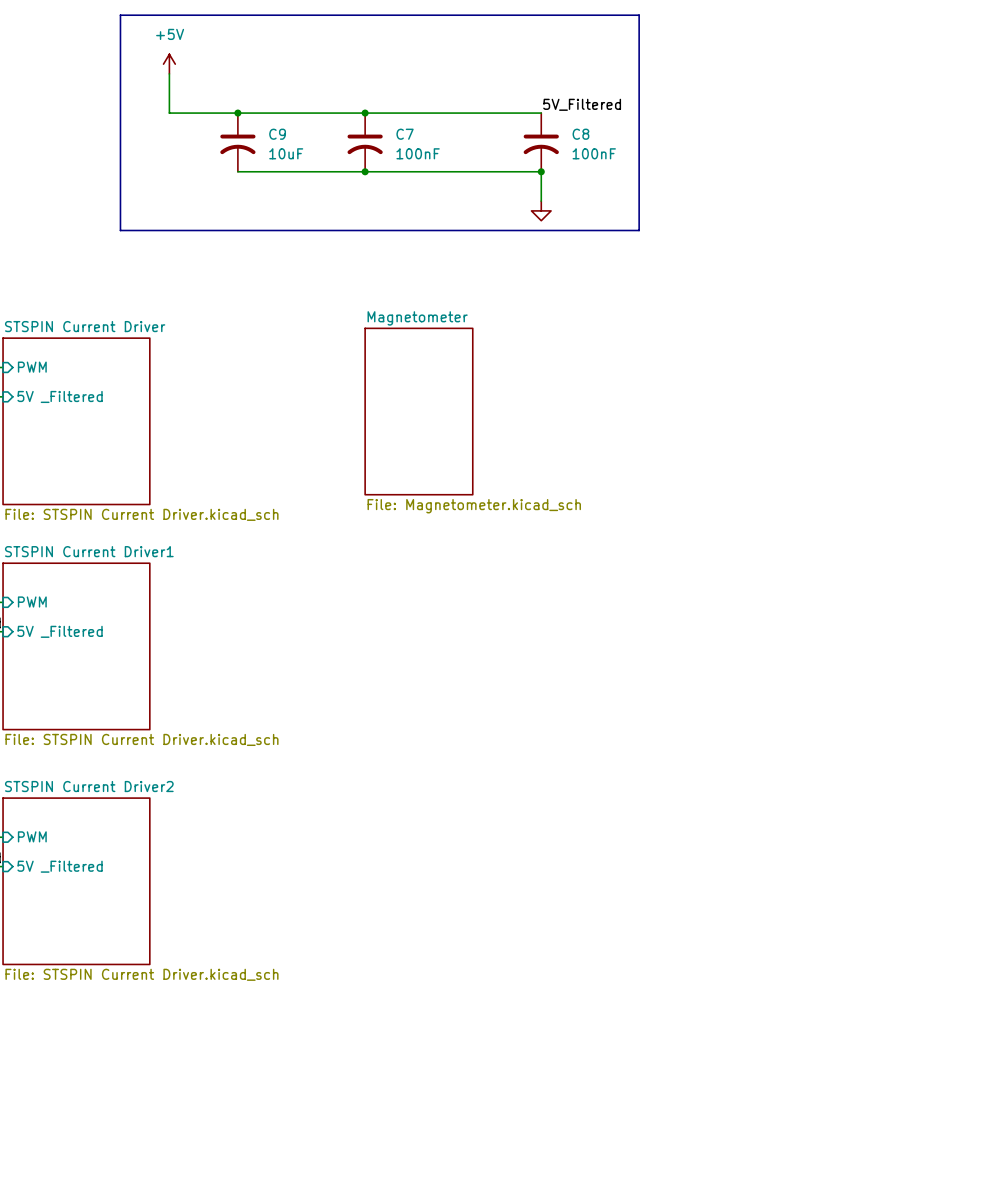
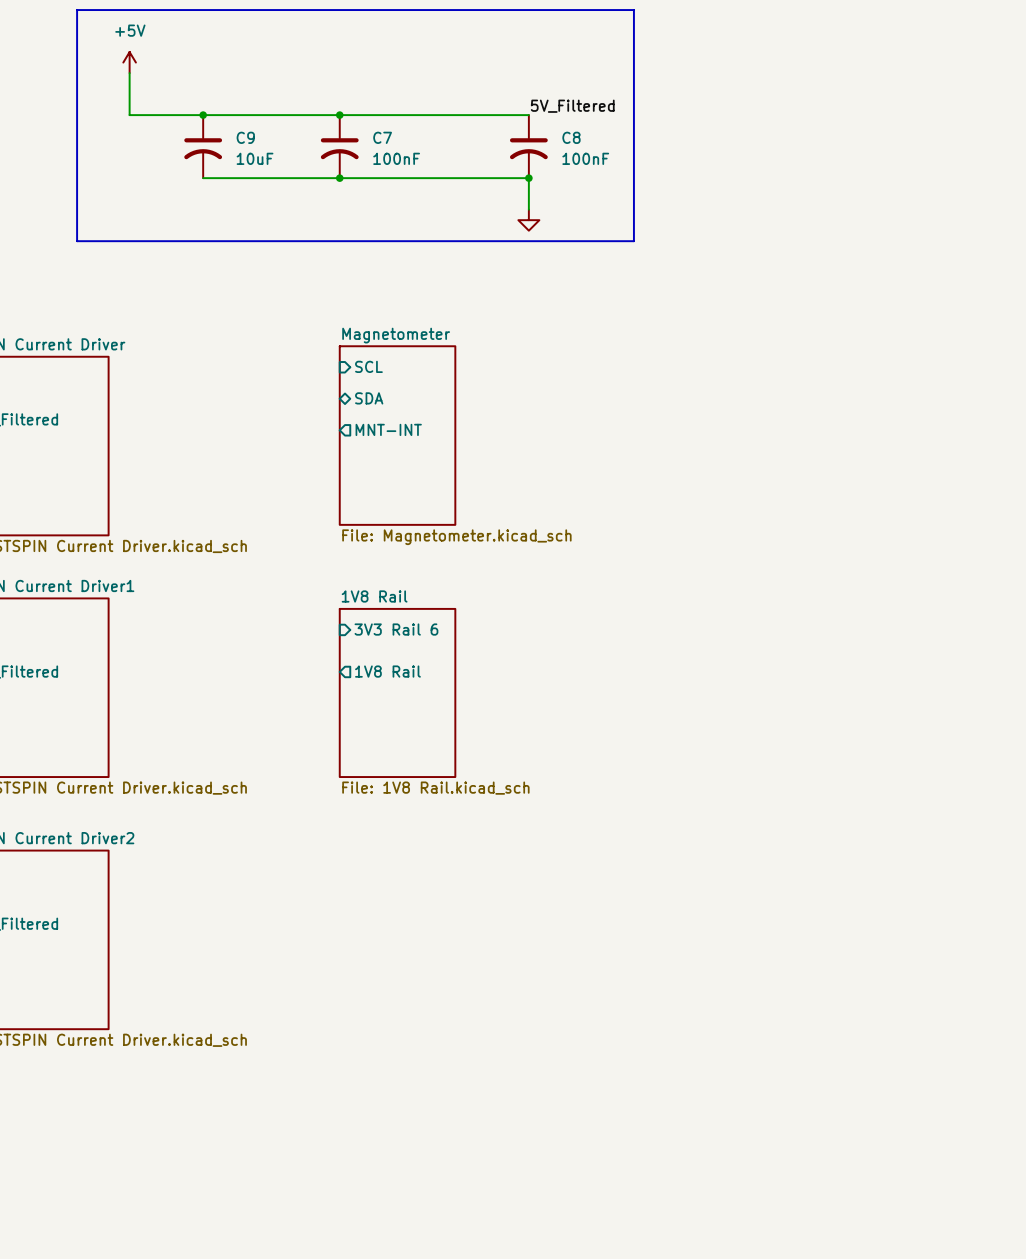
sheet pin: none -> SCL (368, 366)
sheet pin: none -> SDA (369, 398)
sheet pin: none -> MNT-INT (388, 429)
sheet pin: none -> 3V3 Rail 6 (396, 629)
sheet pin: none -> 1V8 Rail (387, 671)
sheet 1V8 Rail: none -> File: 1V8 Rail.kicad_sch (397, 692)

